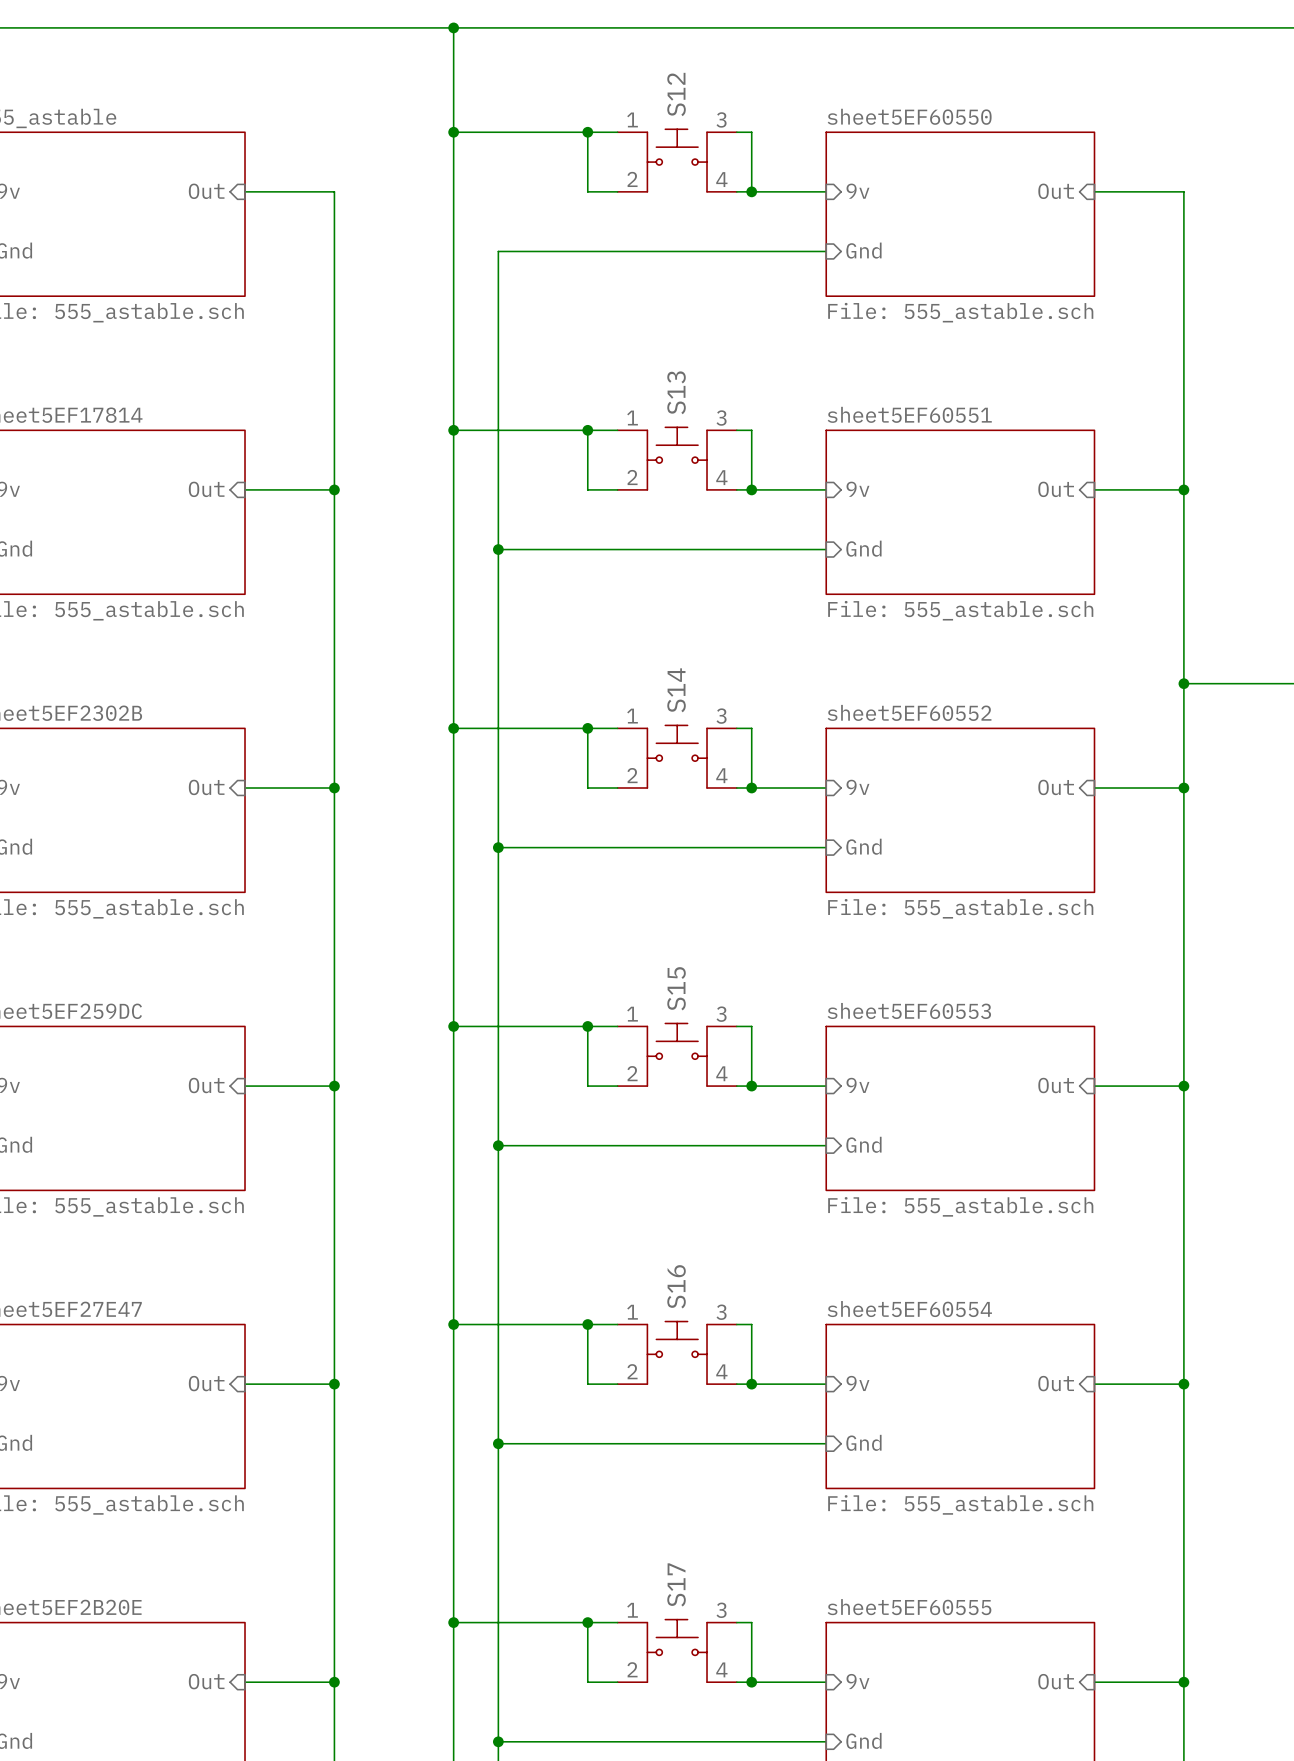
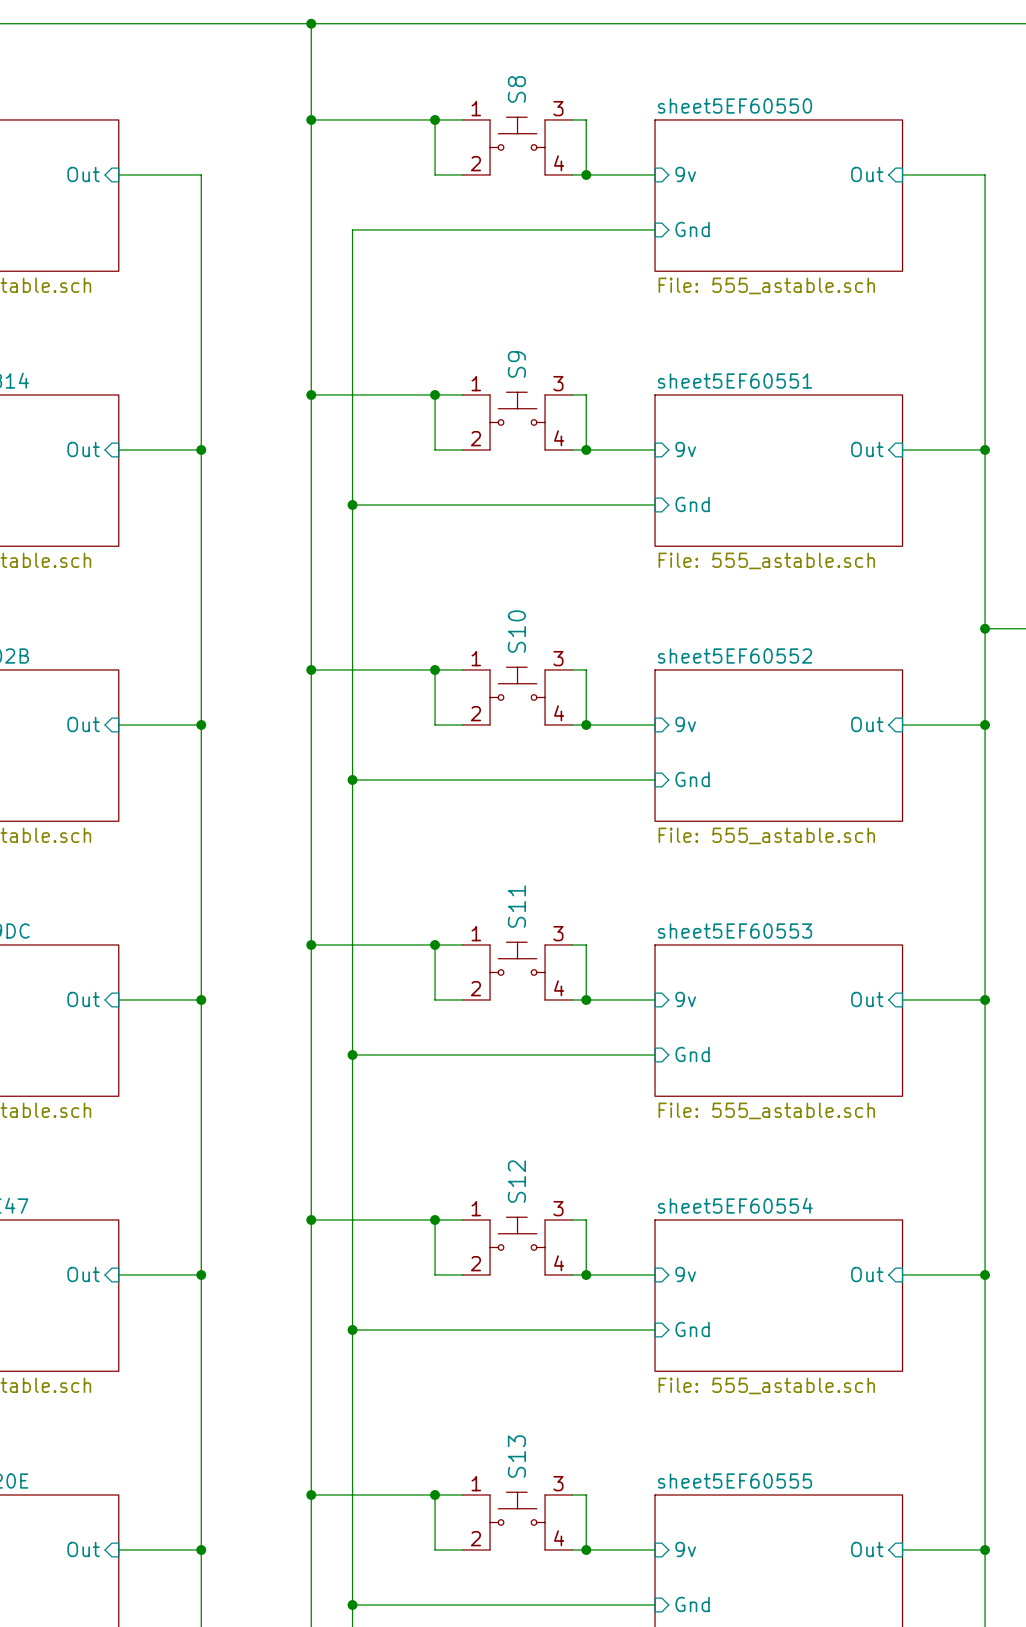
S12 name: S12 (676, 94) -> S8 (516, 89)
S13 name: S13 (676, 392) -> S9 (516, 364)
S14 name: S14 (676, 690) -> S10 (516, 631)
S15 name: S15 (676, 988) -> S11 (516, 906)
S16 name: S16 (676, 1286) -> S12 (516, 1181)
S17 name: S17 (676, 1584) -> S13 (516, 1456)

